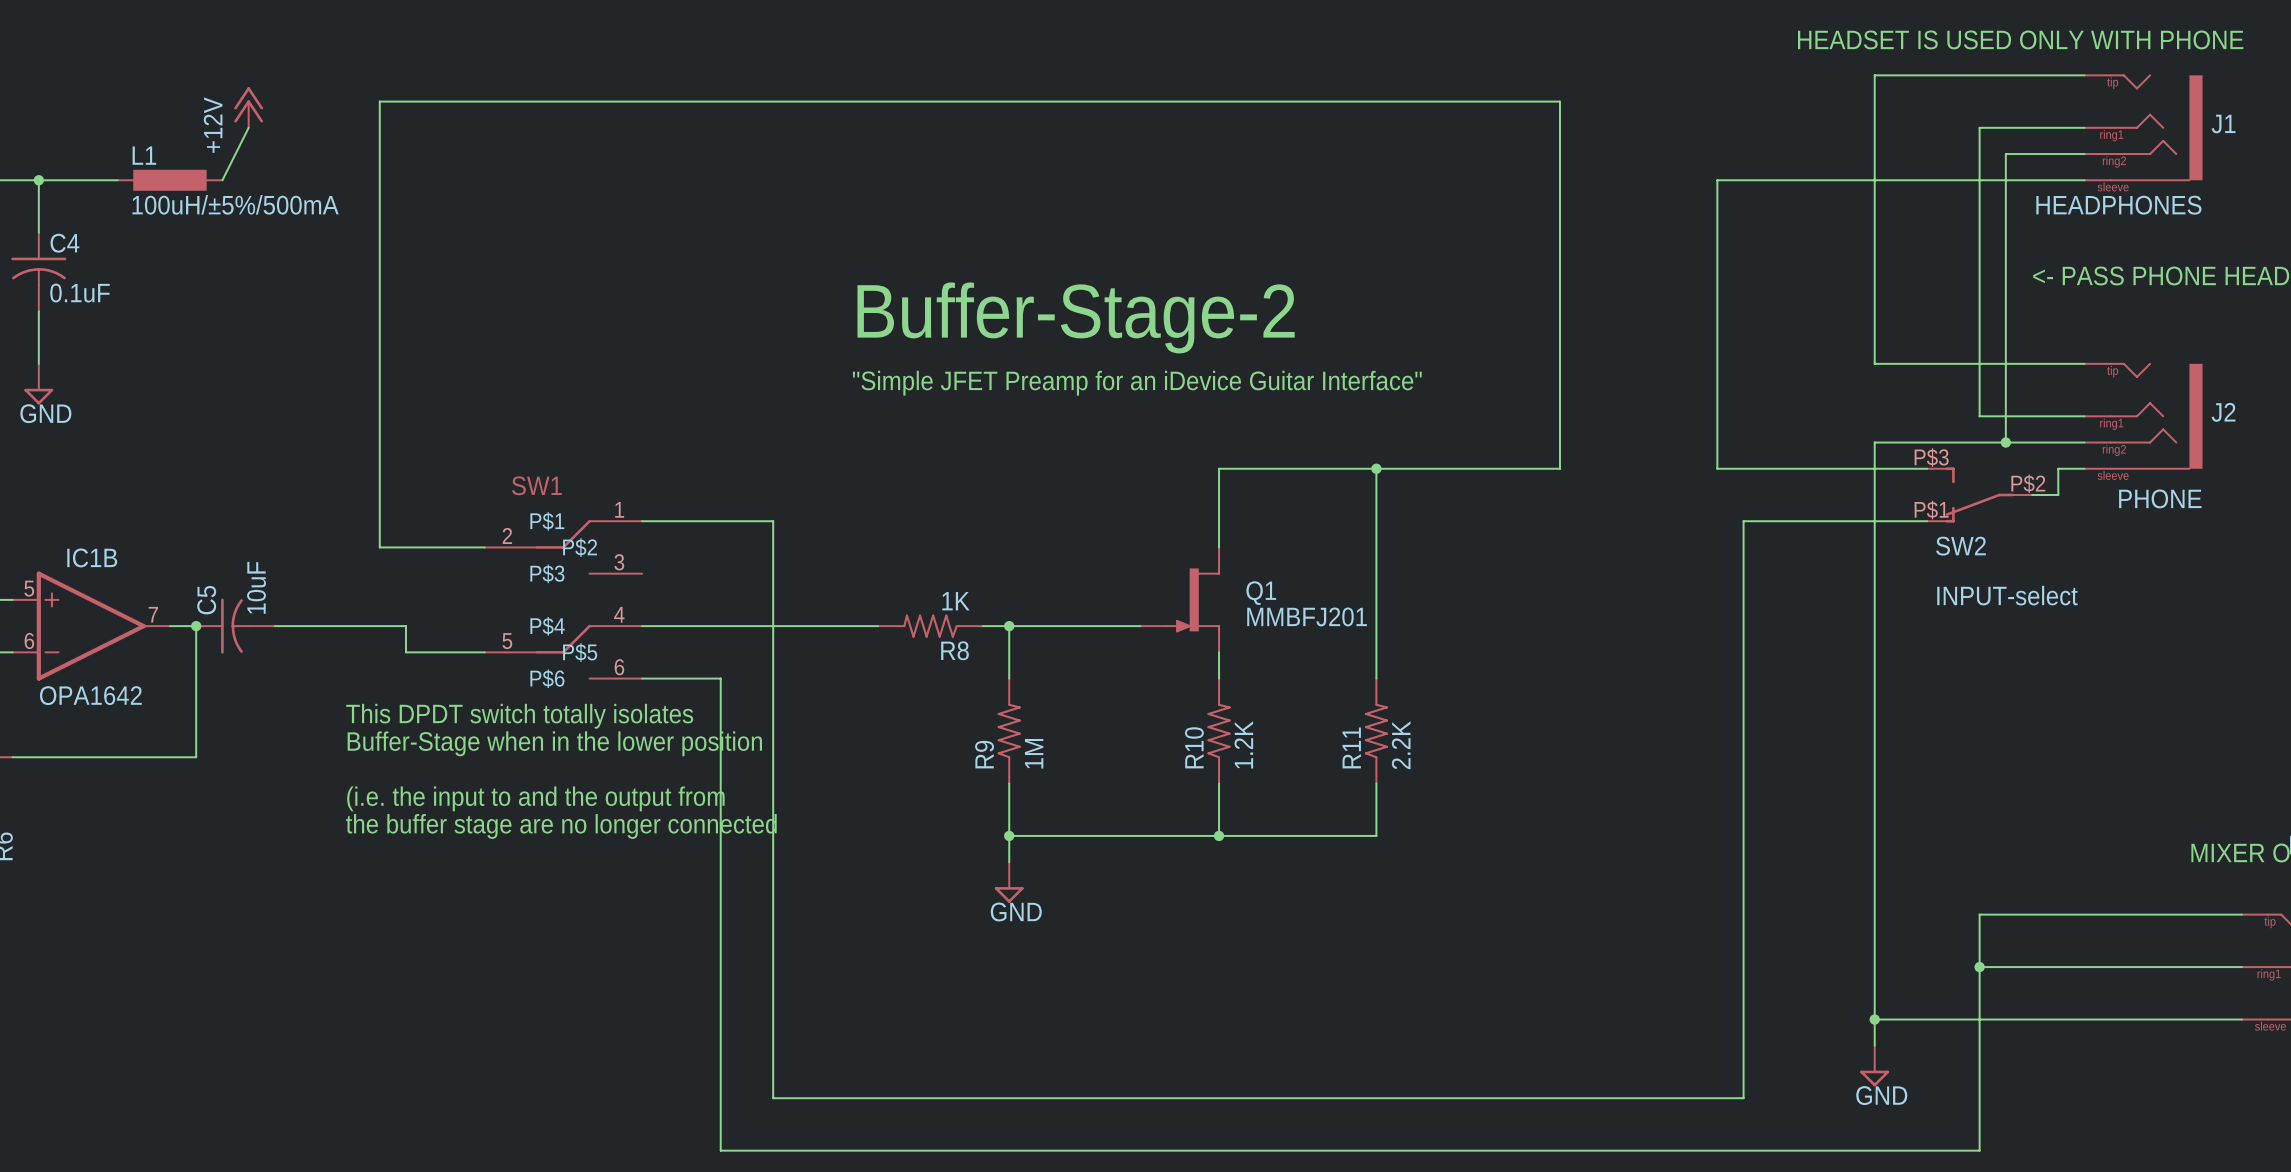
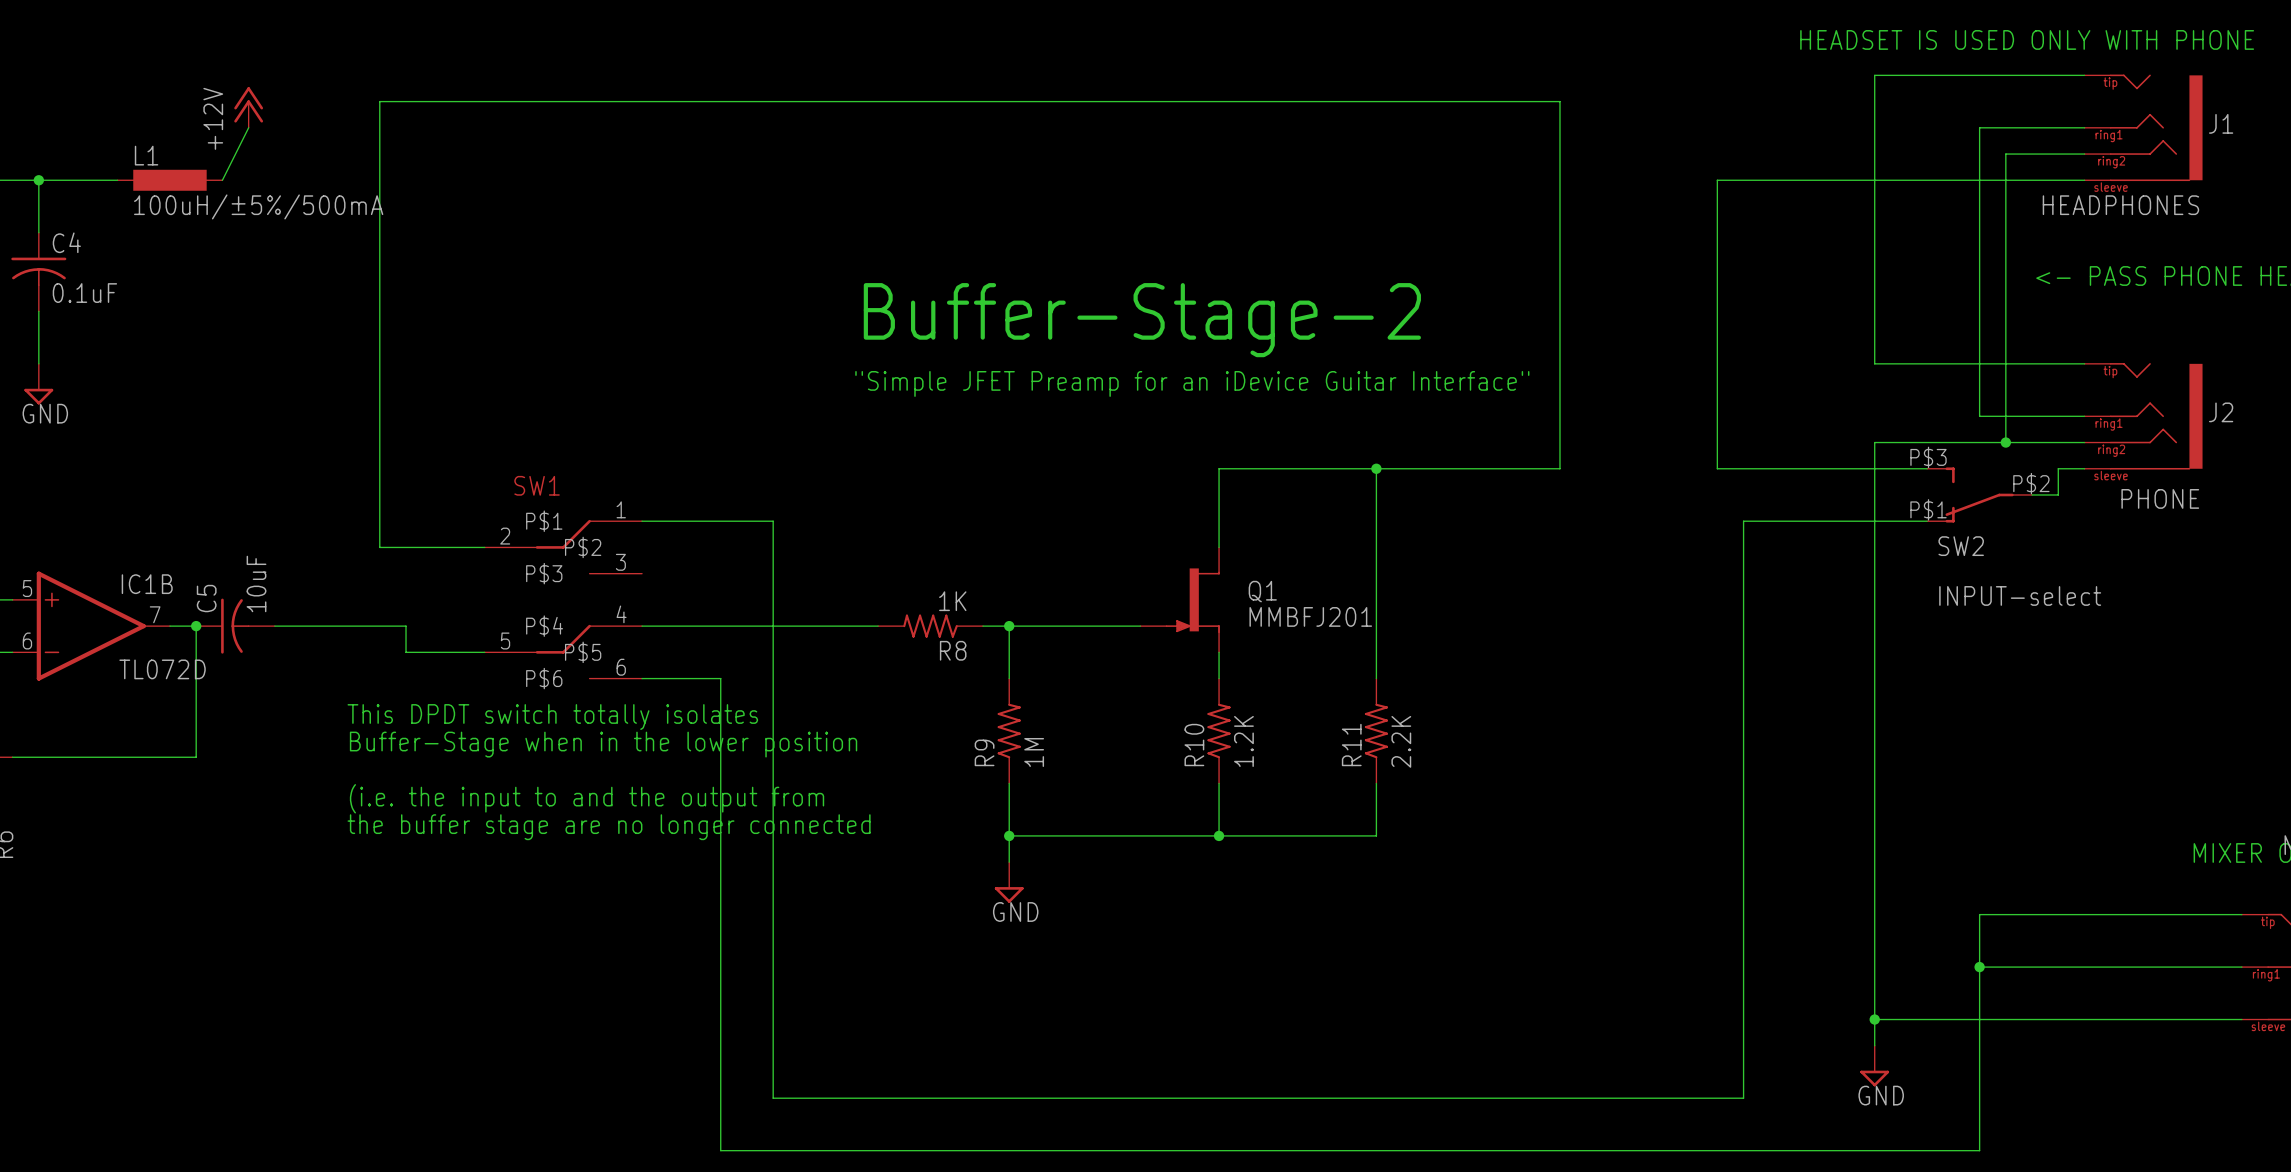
IC1B name position: IC1B (92, 557) -> IC1B (147, 584)
IC1B value: OPA1642 (90, 695) -> TL072D (162, 669)

